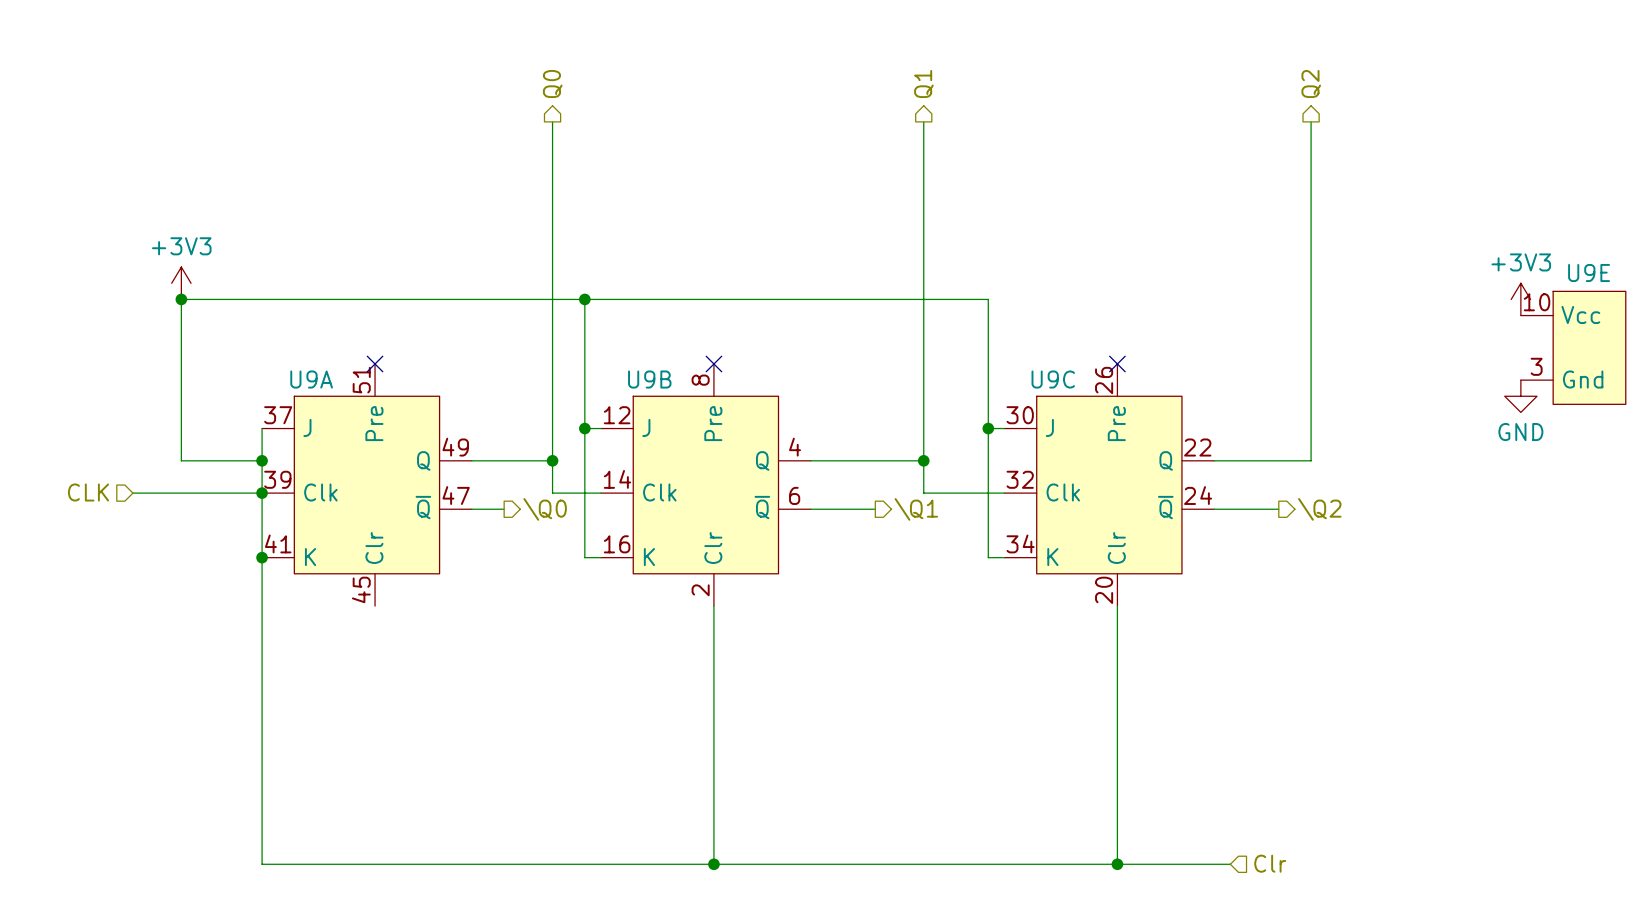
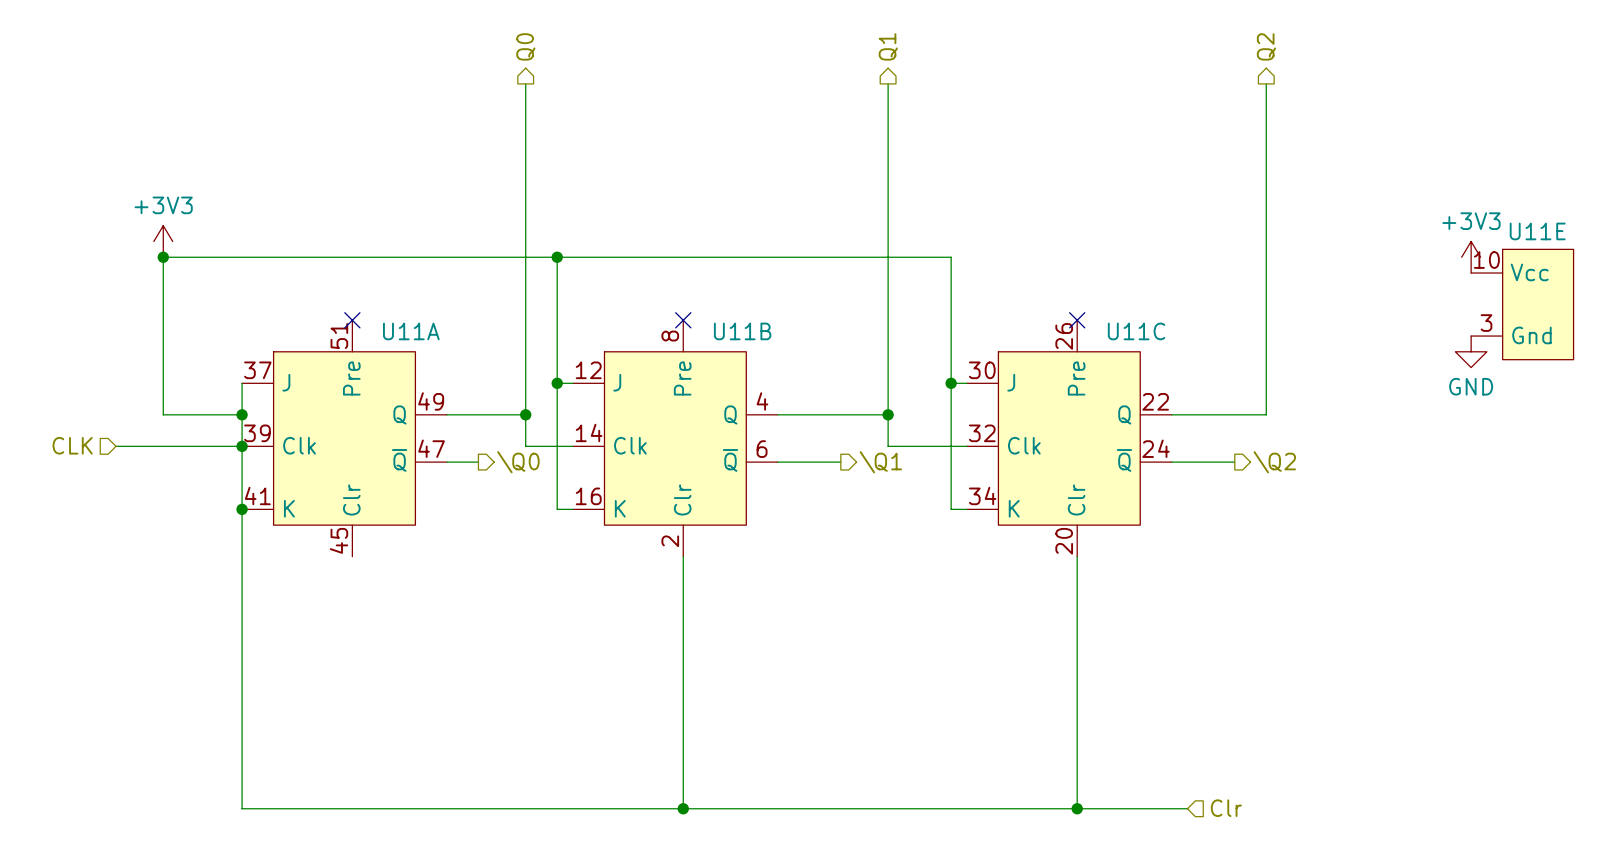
U9E name: U9E (1589, 273) -> U11E (1537, 231)
U9A name: U9A (311, 379) -> U11A (411, 331)
U9B name: U9B (649, 379) -> U11B (742, 331)
U9C name: U9C (1053, 379) -> U11C (1136, 331)

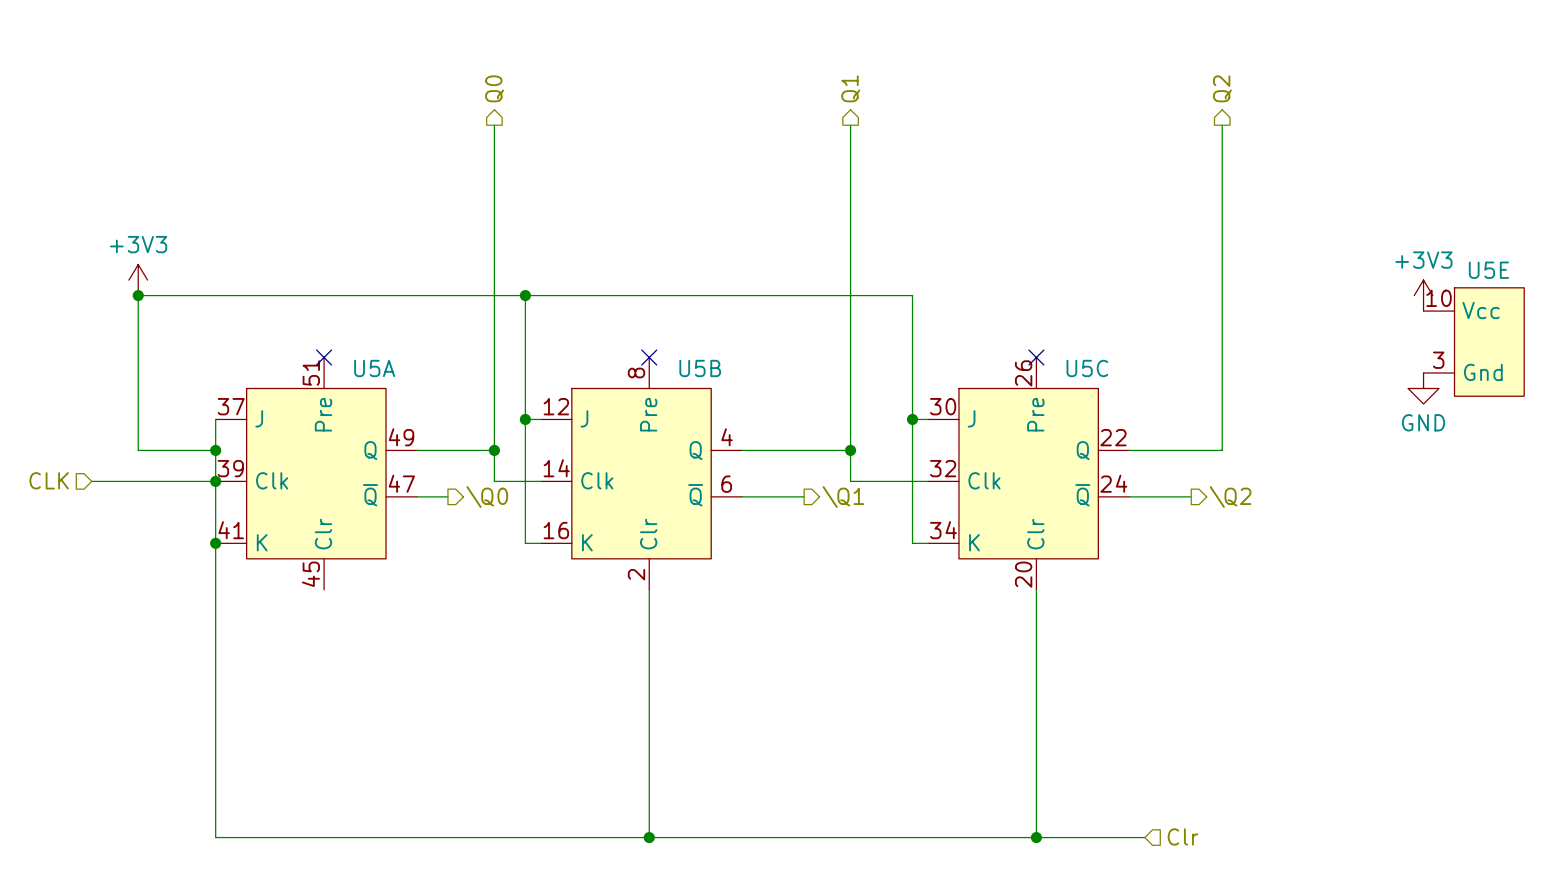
U11E name: U11E (1537, 231) -> U5E (1488, 270)
U11A name: U11A (411, 331) -> U5A (374, 368)
U11B name: U11B (742, 331) -> U5B (700, 368)
U11C name: U11C (1136, 331) -> U5C (1087, 368)

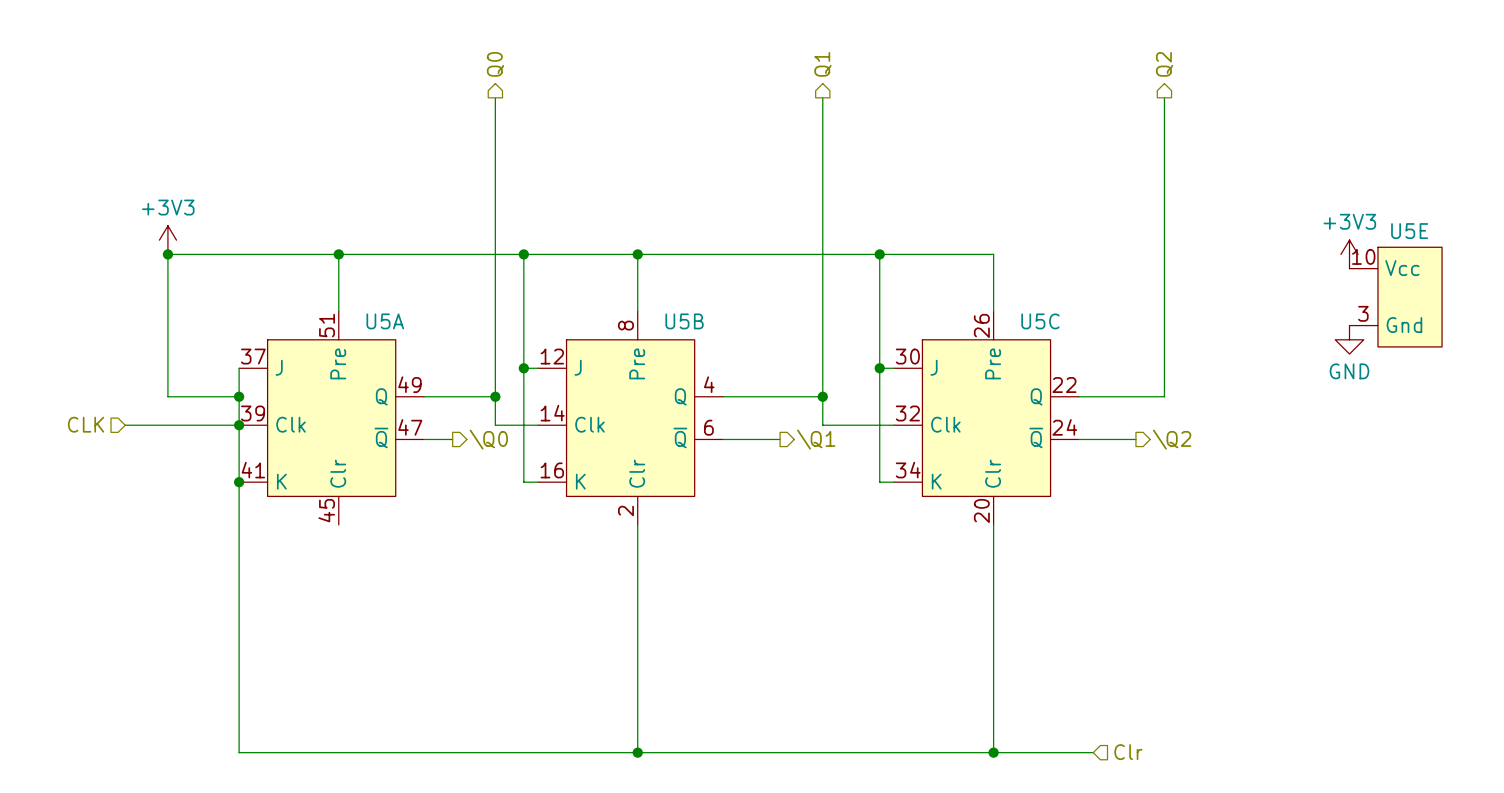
wire: none -> (338, 254) (338, 311)
junction: none -> (338, 254)
wire: none -> (637, 254) (637, 311)
junction: none -> (637, 254)
wire: none -> (879, 254) (993, 254) (993, 311)
junction: none -> (879, 254)
no-connect mark: (324, 357) -> none
no-connect mark: (649, 357) -> none
no-connect mark: (1036, 357) -> none

